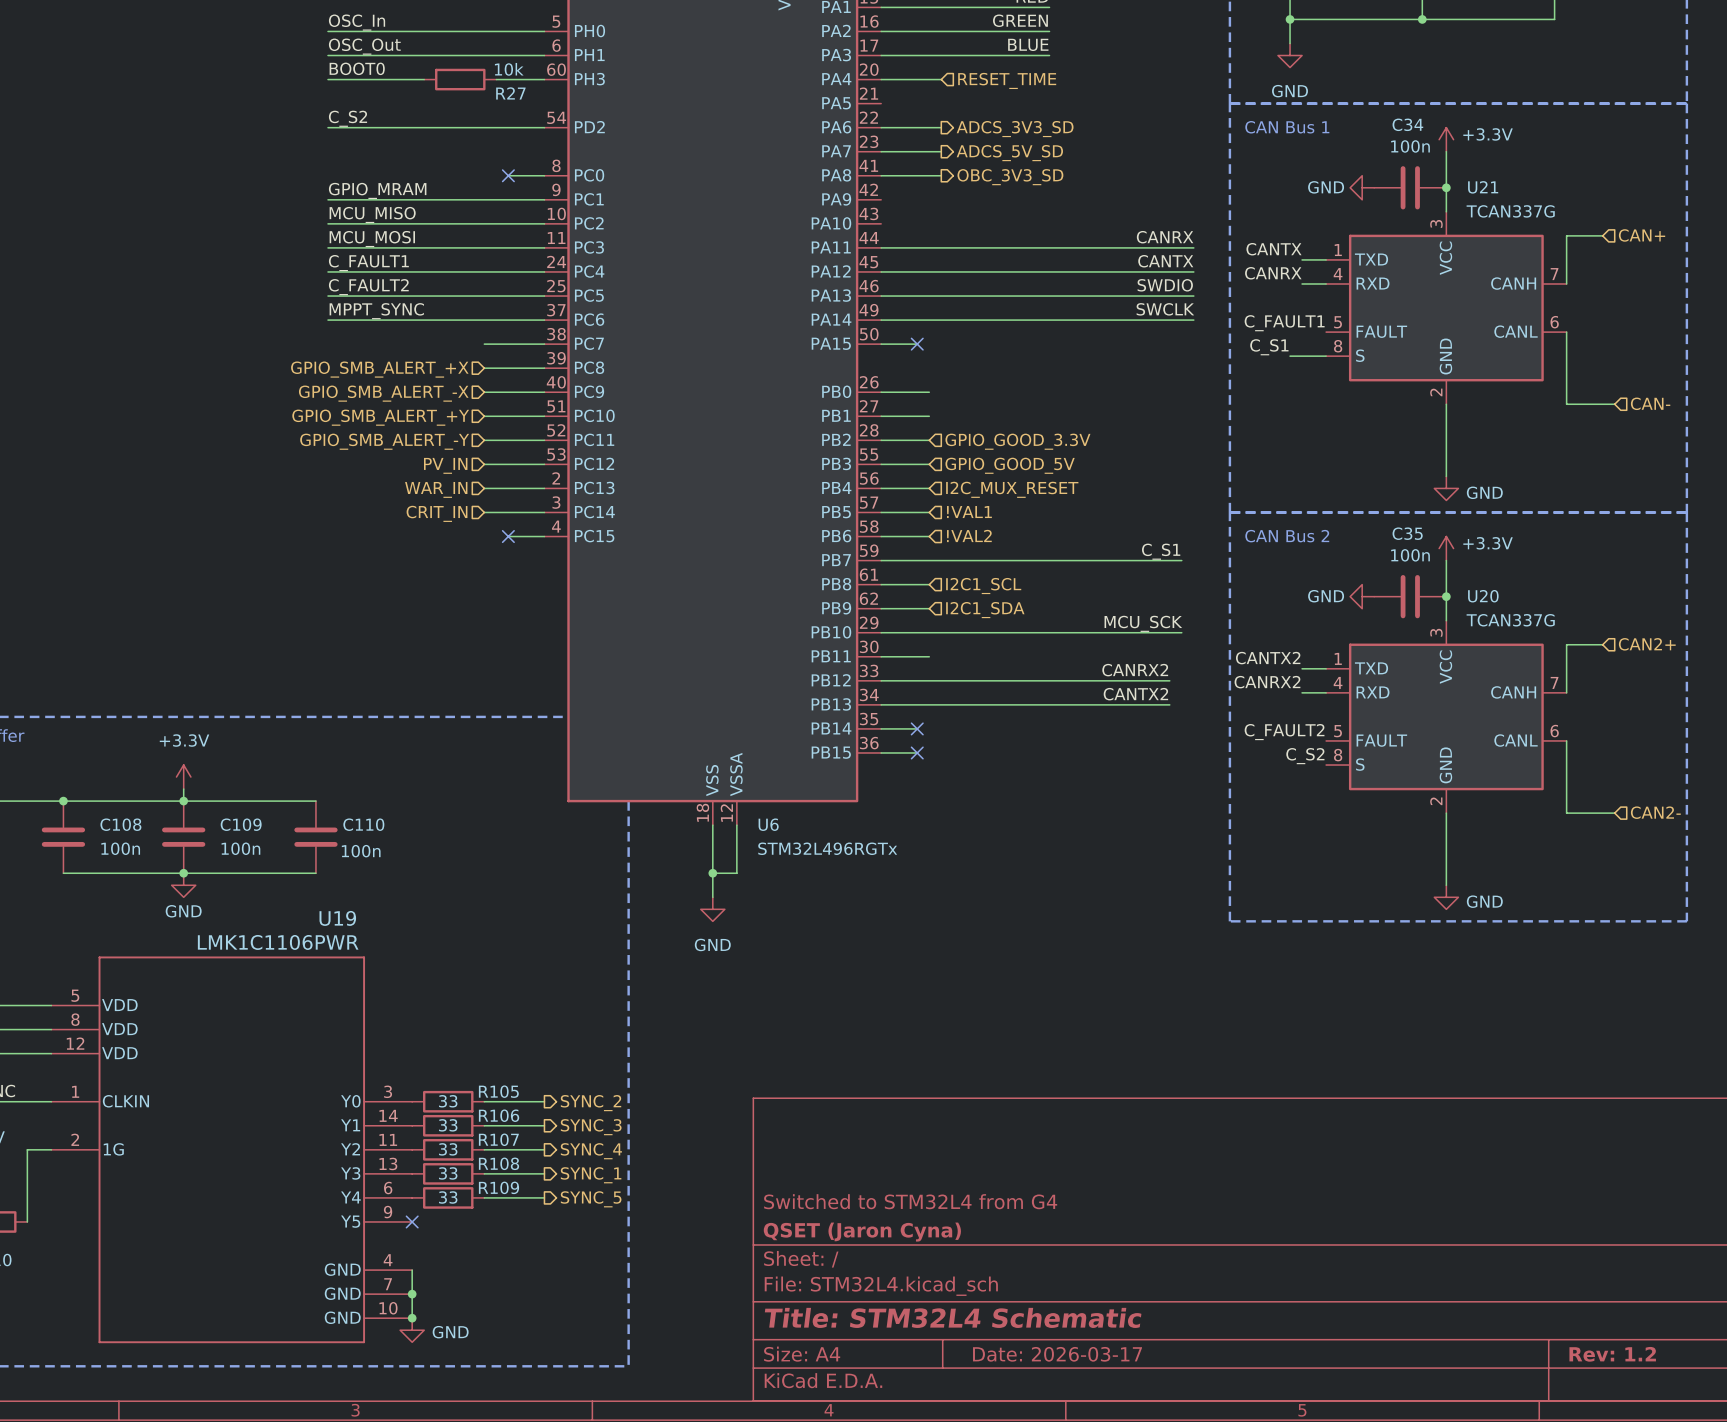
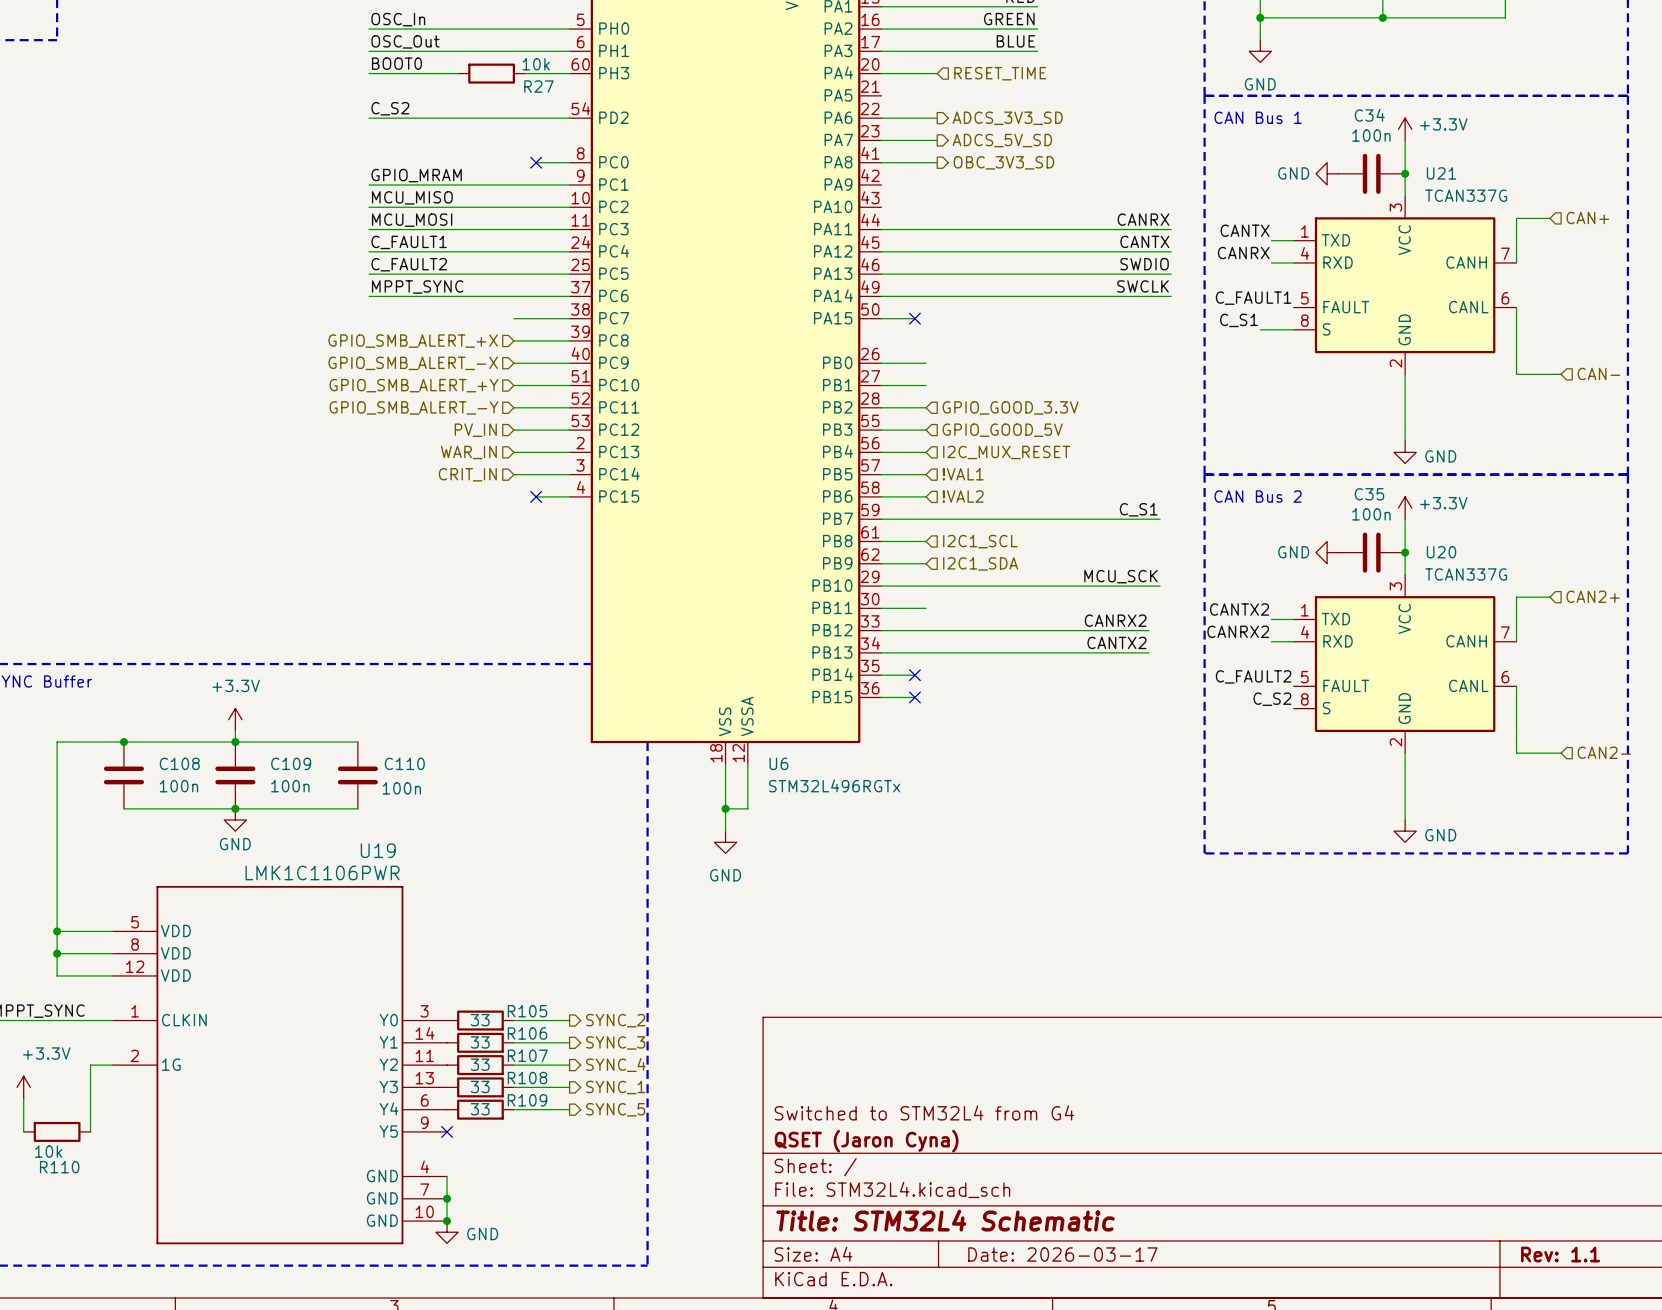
title block: Rev: 1.2 (1612, 1354) -> Rev: 1.1 (1560, 1254)

